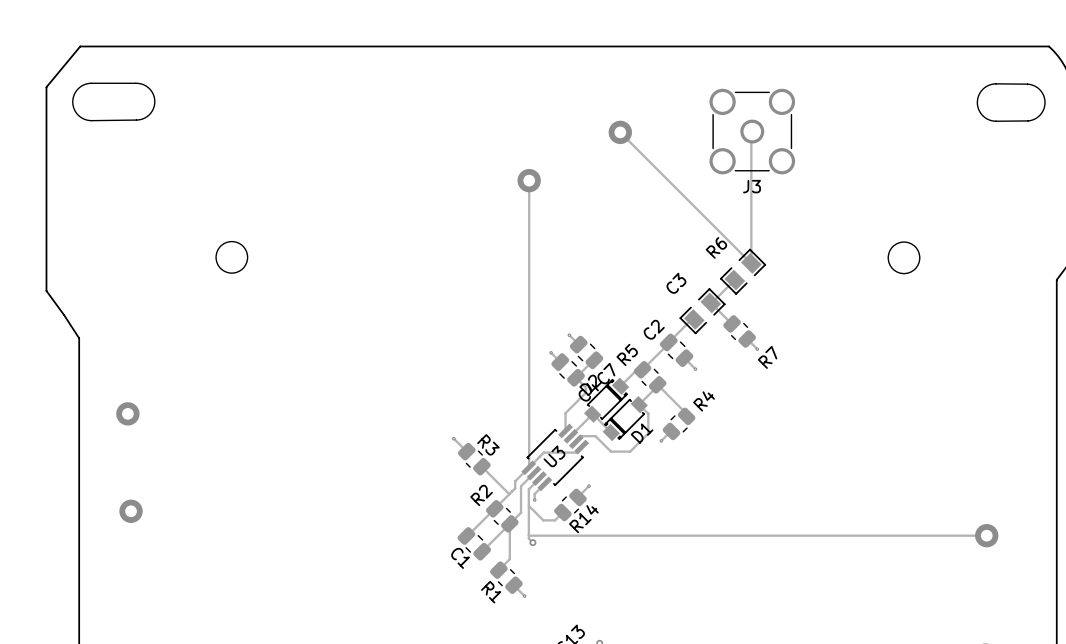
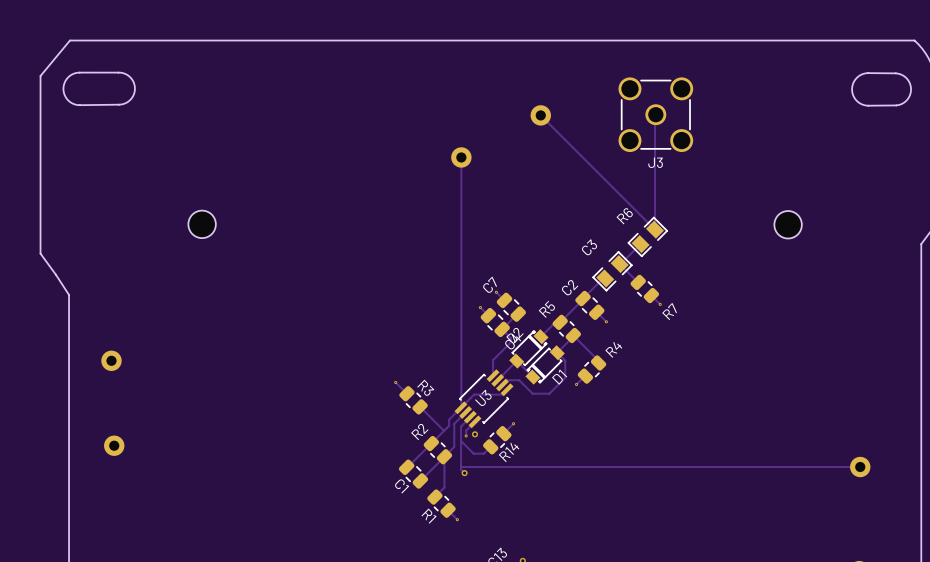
C7 name position: C7 (606, 373) -> C7 (490, 284)
via: none -> (475, 434)

